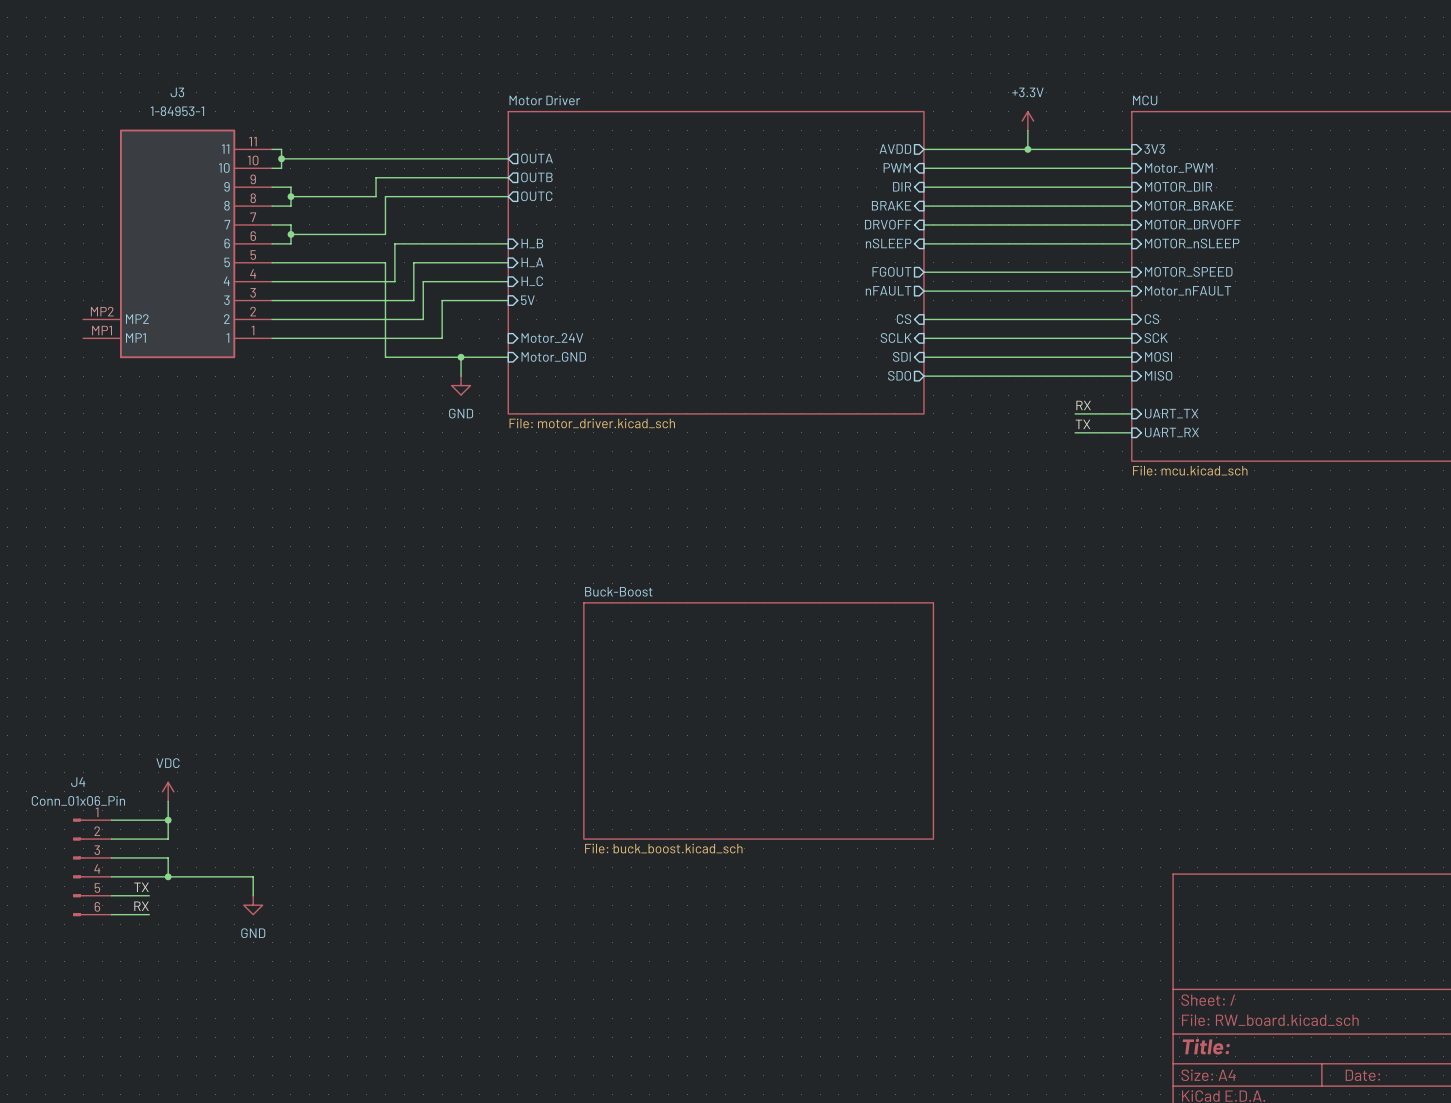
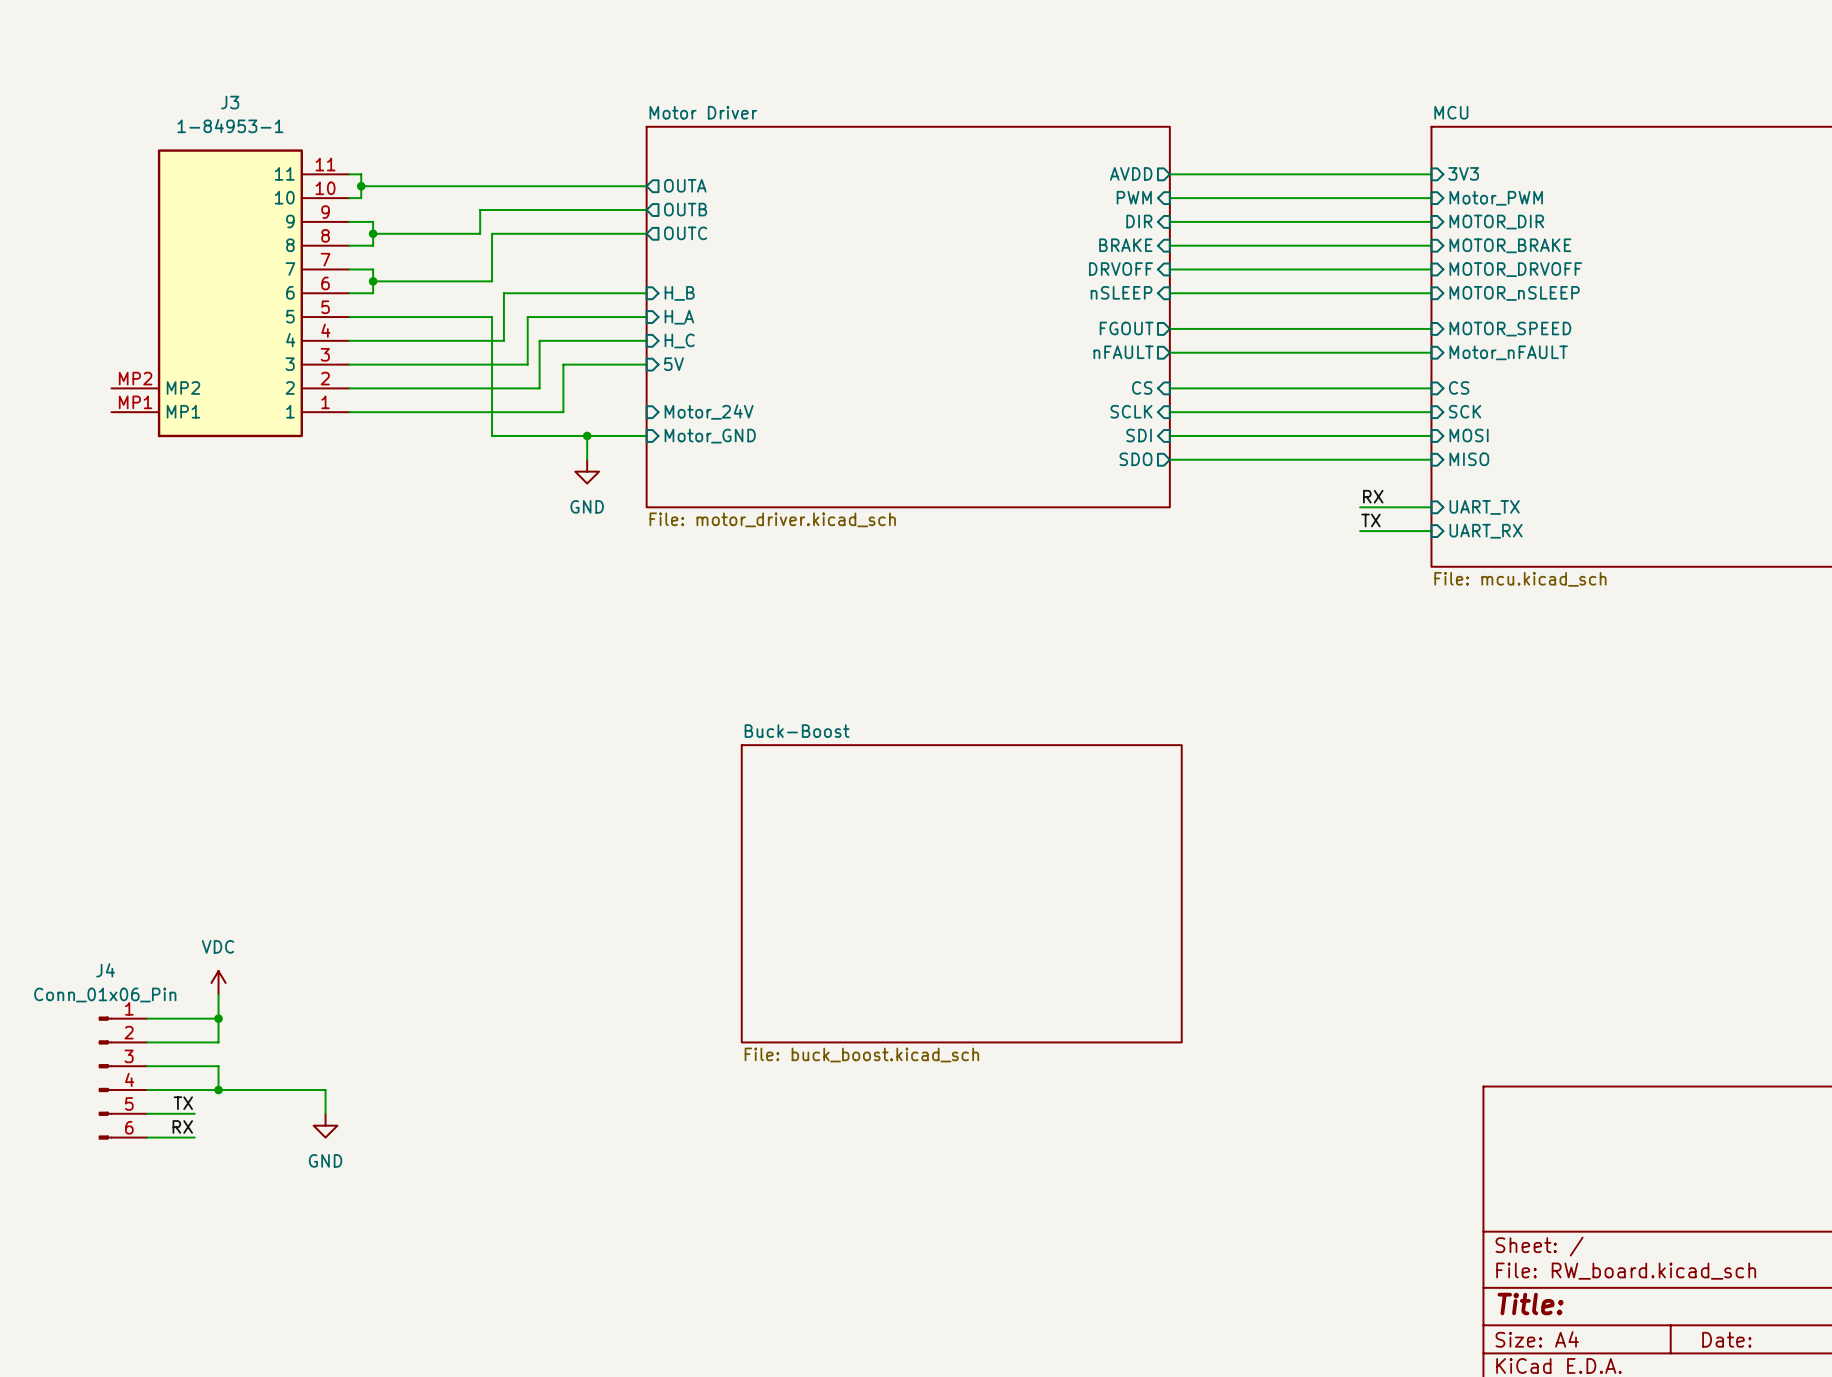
power symbol: +3.3V (1027, 121) -> none
wire: (1027, 130) (1027, 149) -> none
junction: (1027, 149) -> none

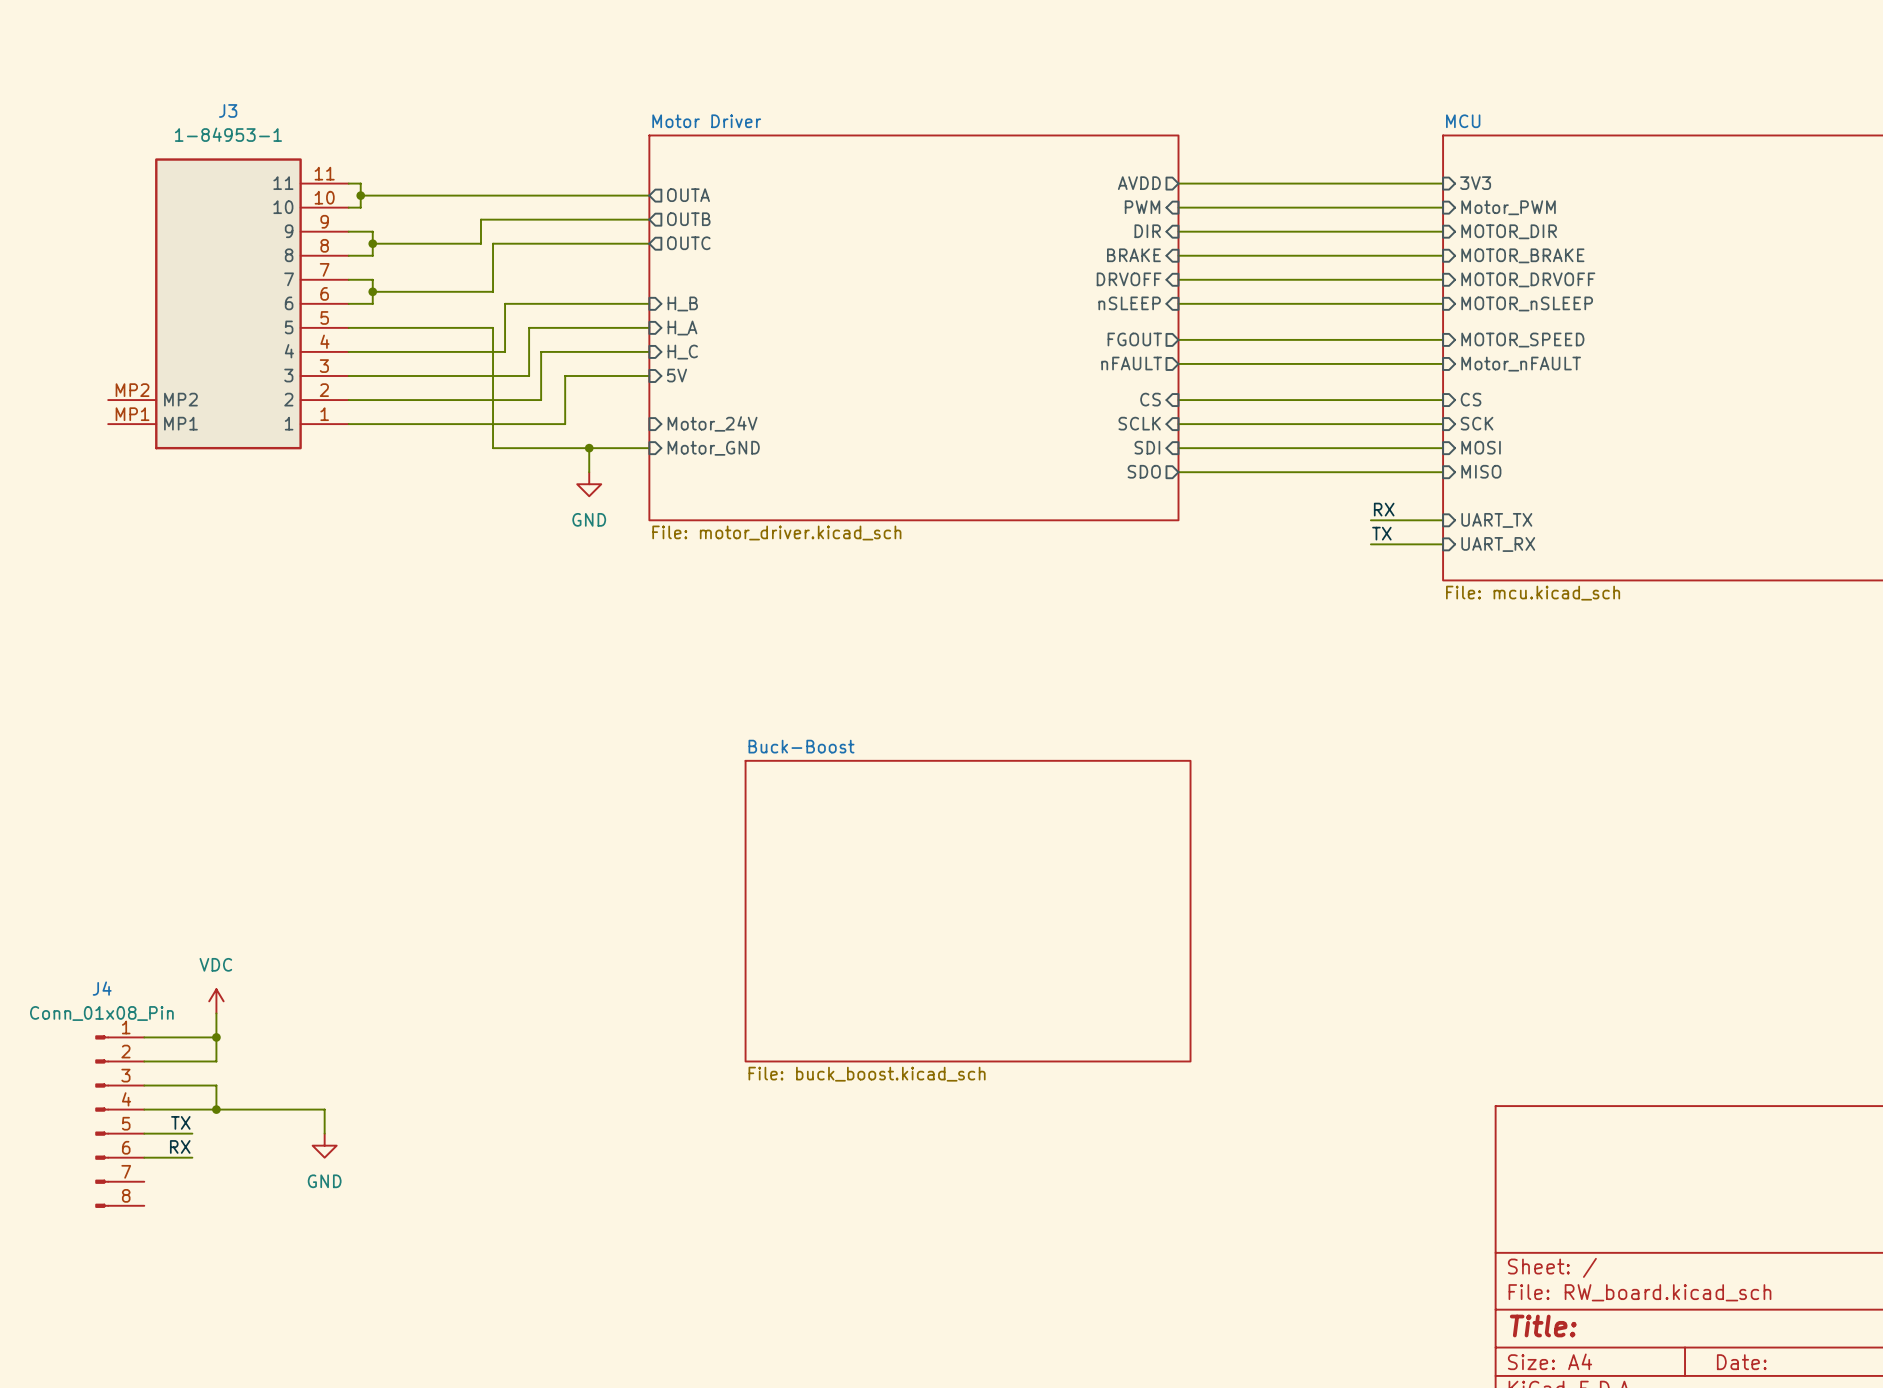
J4 value: Conn_01x06_Pin (105, 994) -> Conn_01x08_Pin (101, 1013)
J4 symbol: [98, 1016, 148, 1140] -> [95, 1035, 145, 1208]

